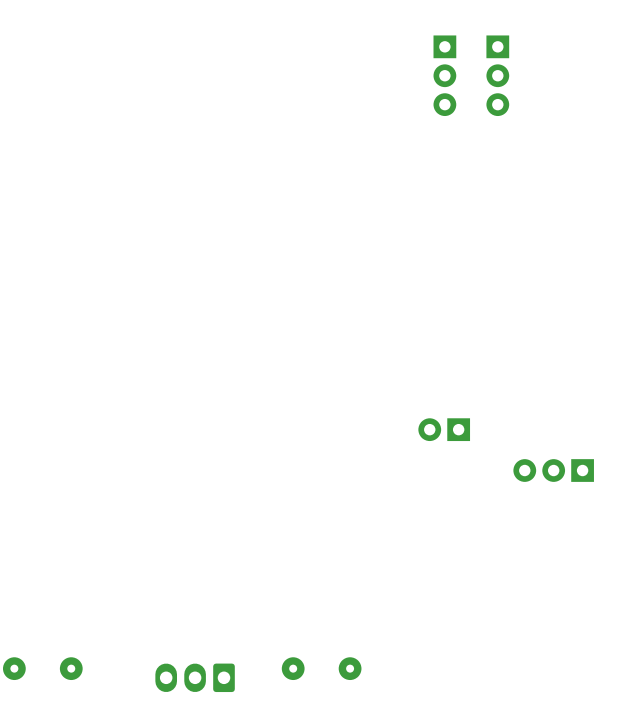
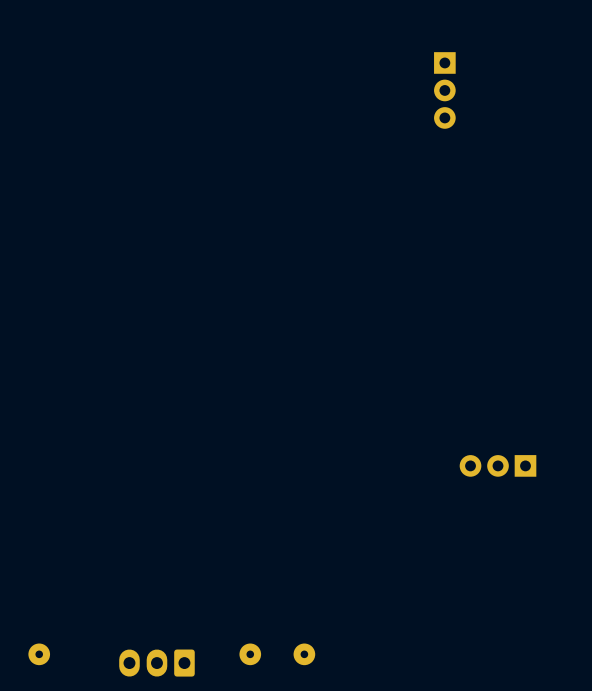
part: (444, 75) -> none
part: (444, 429) -> none

